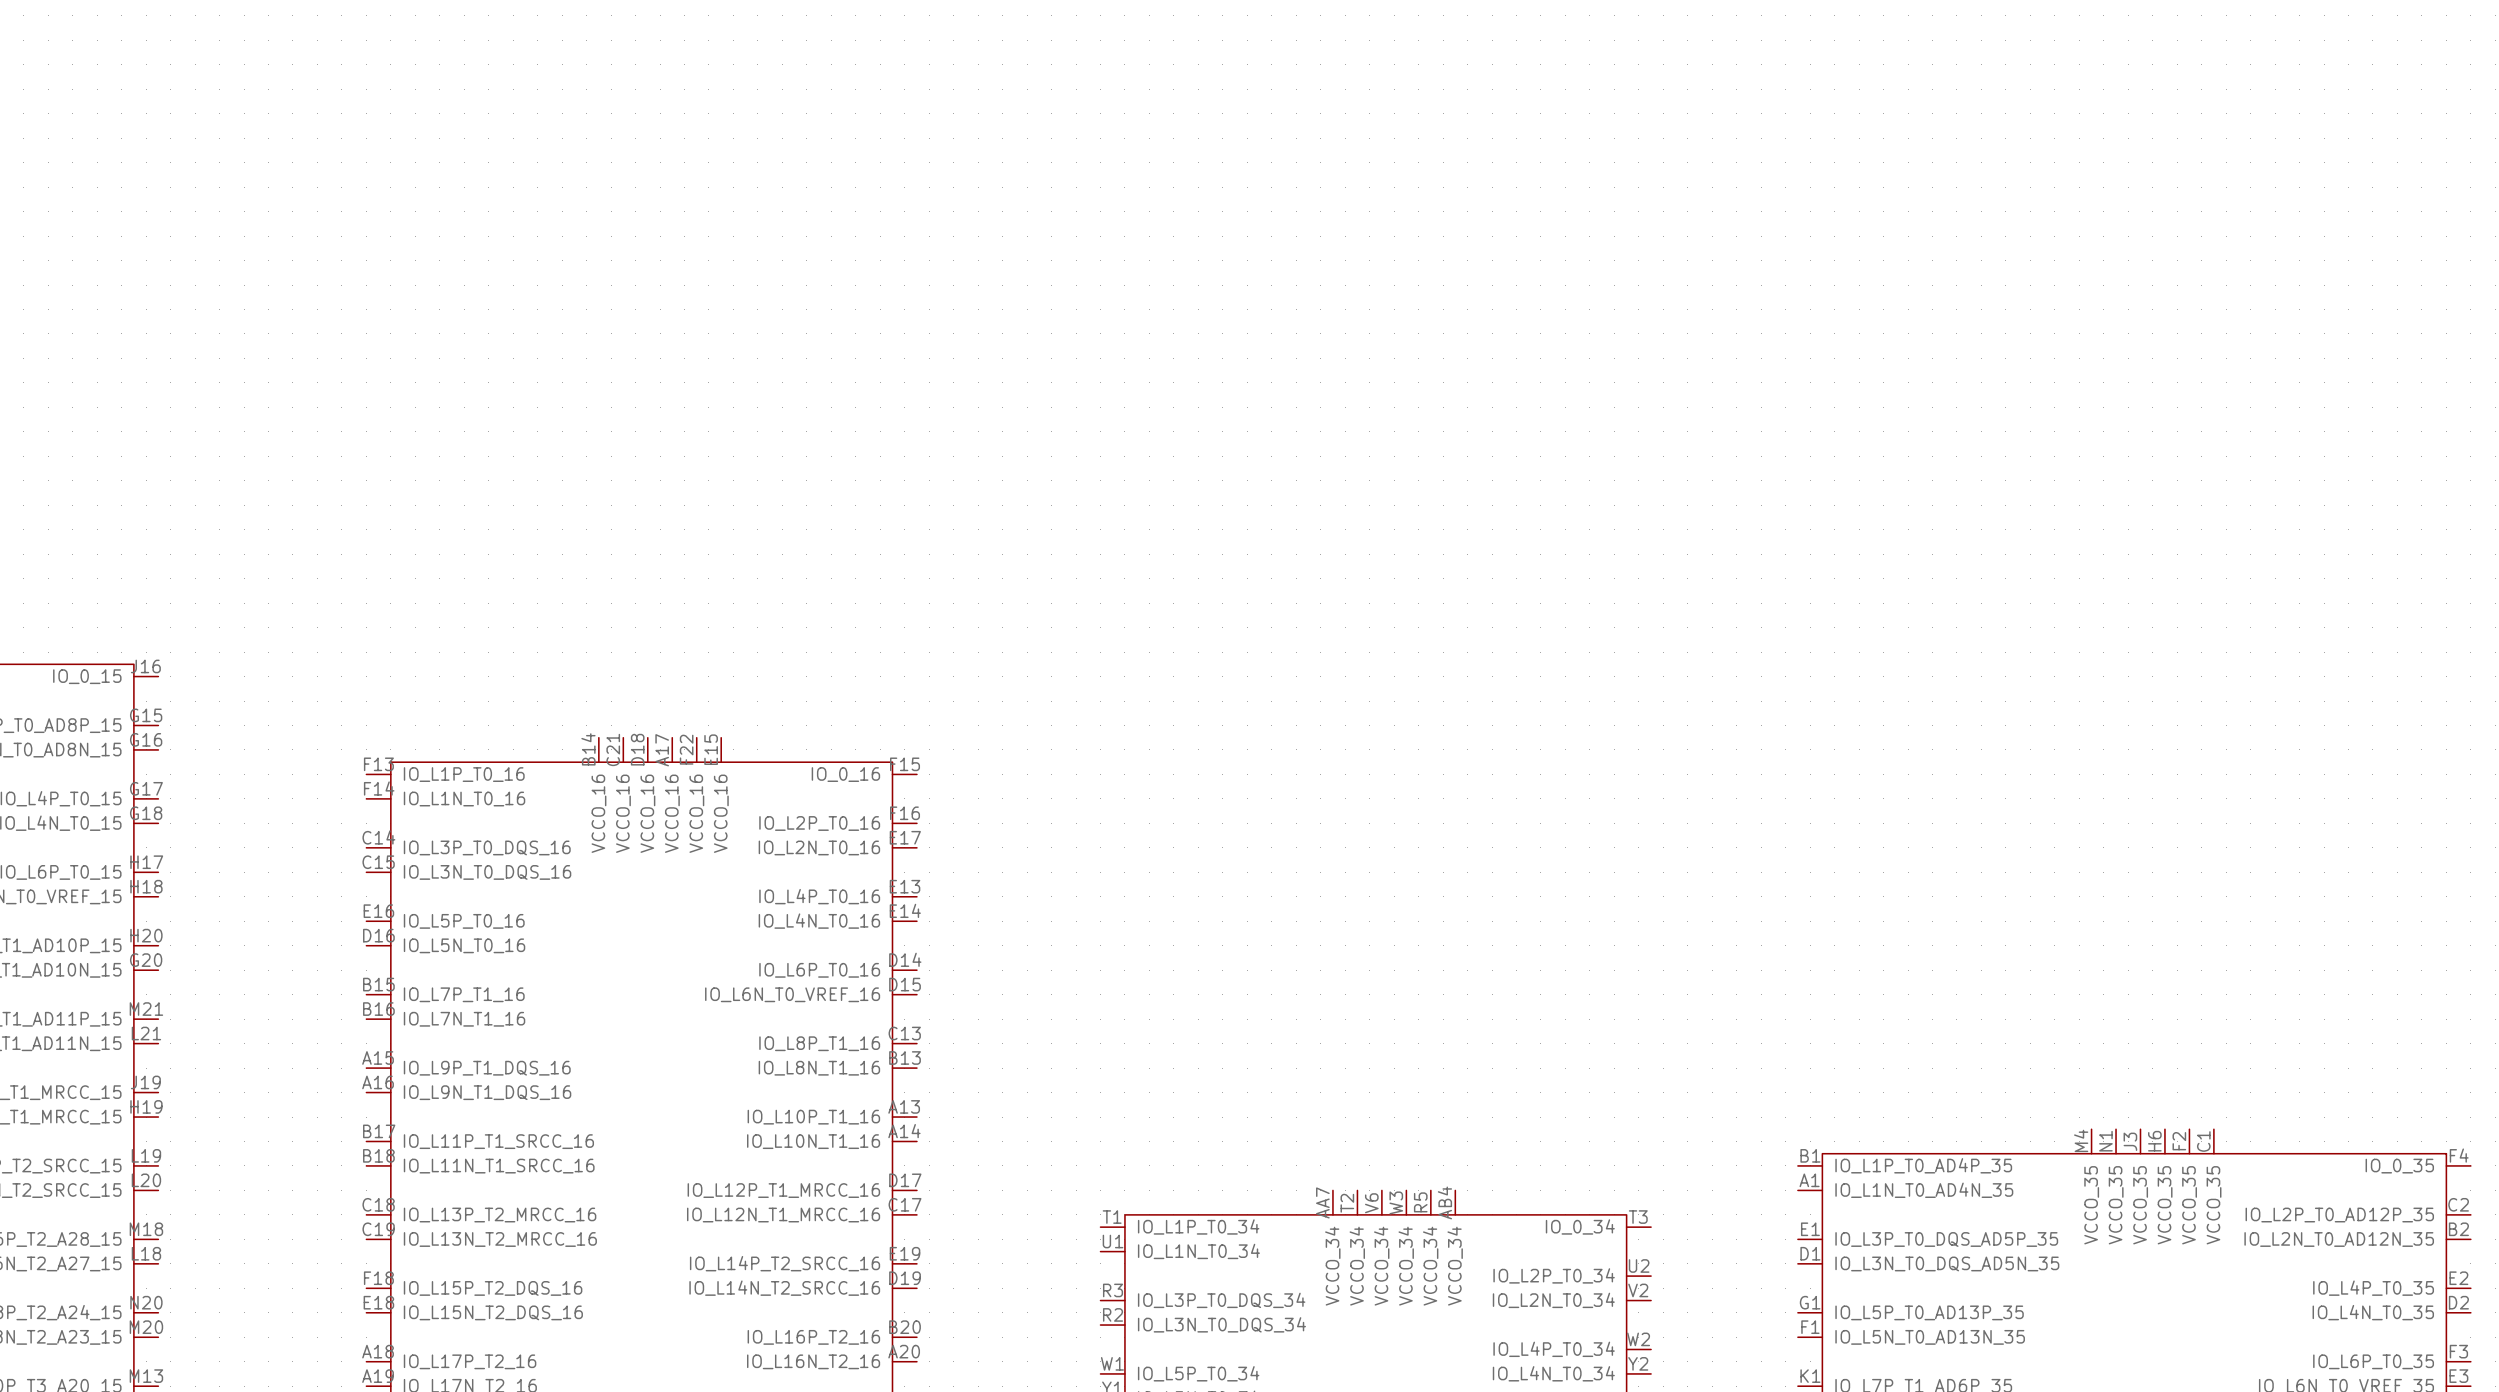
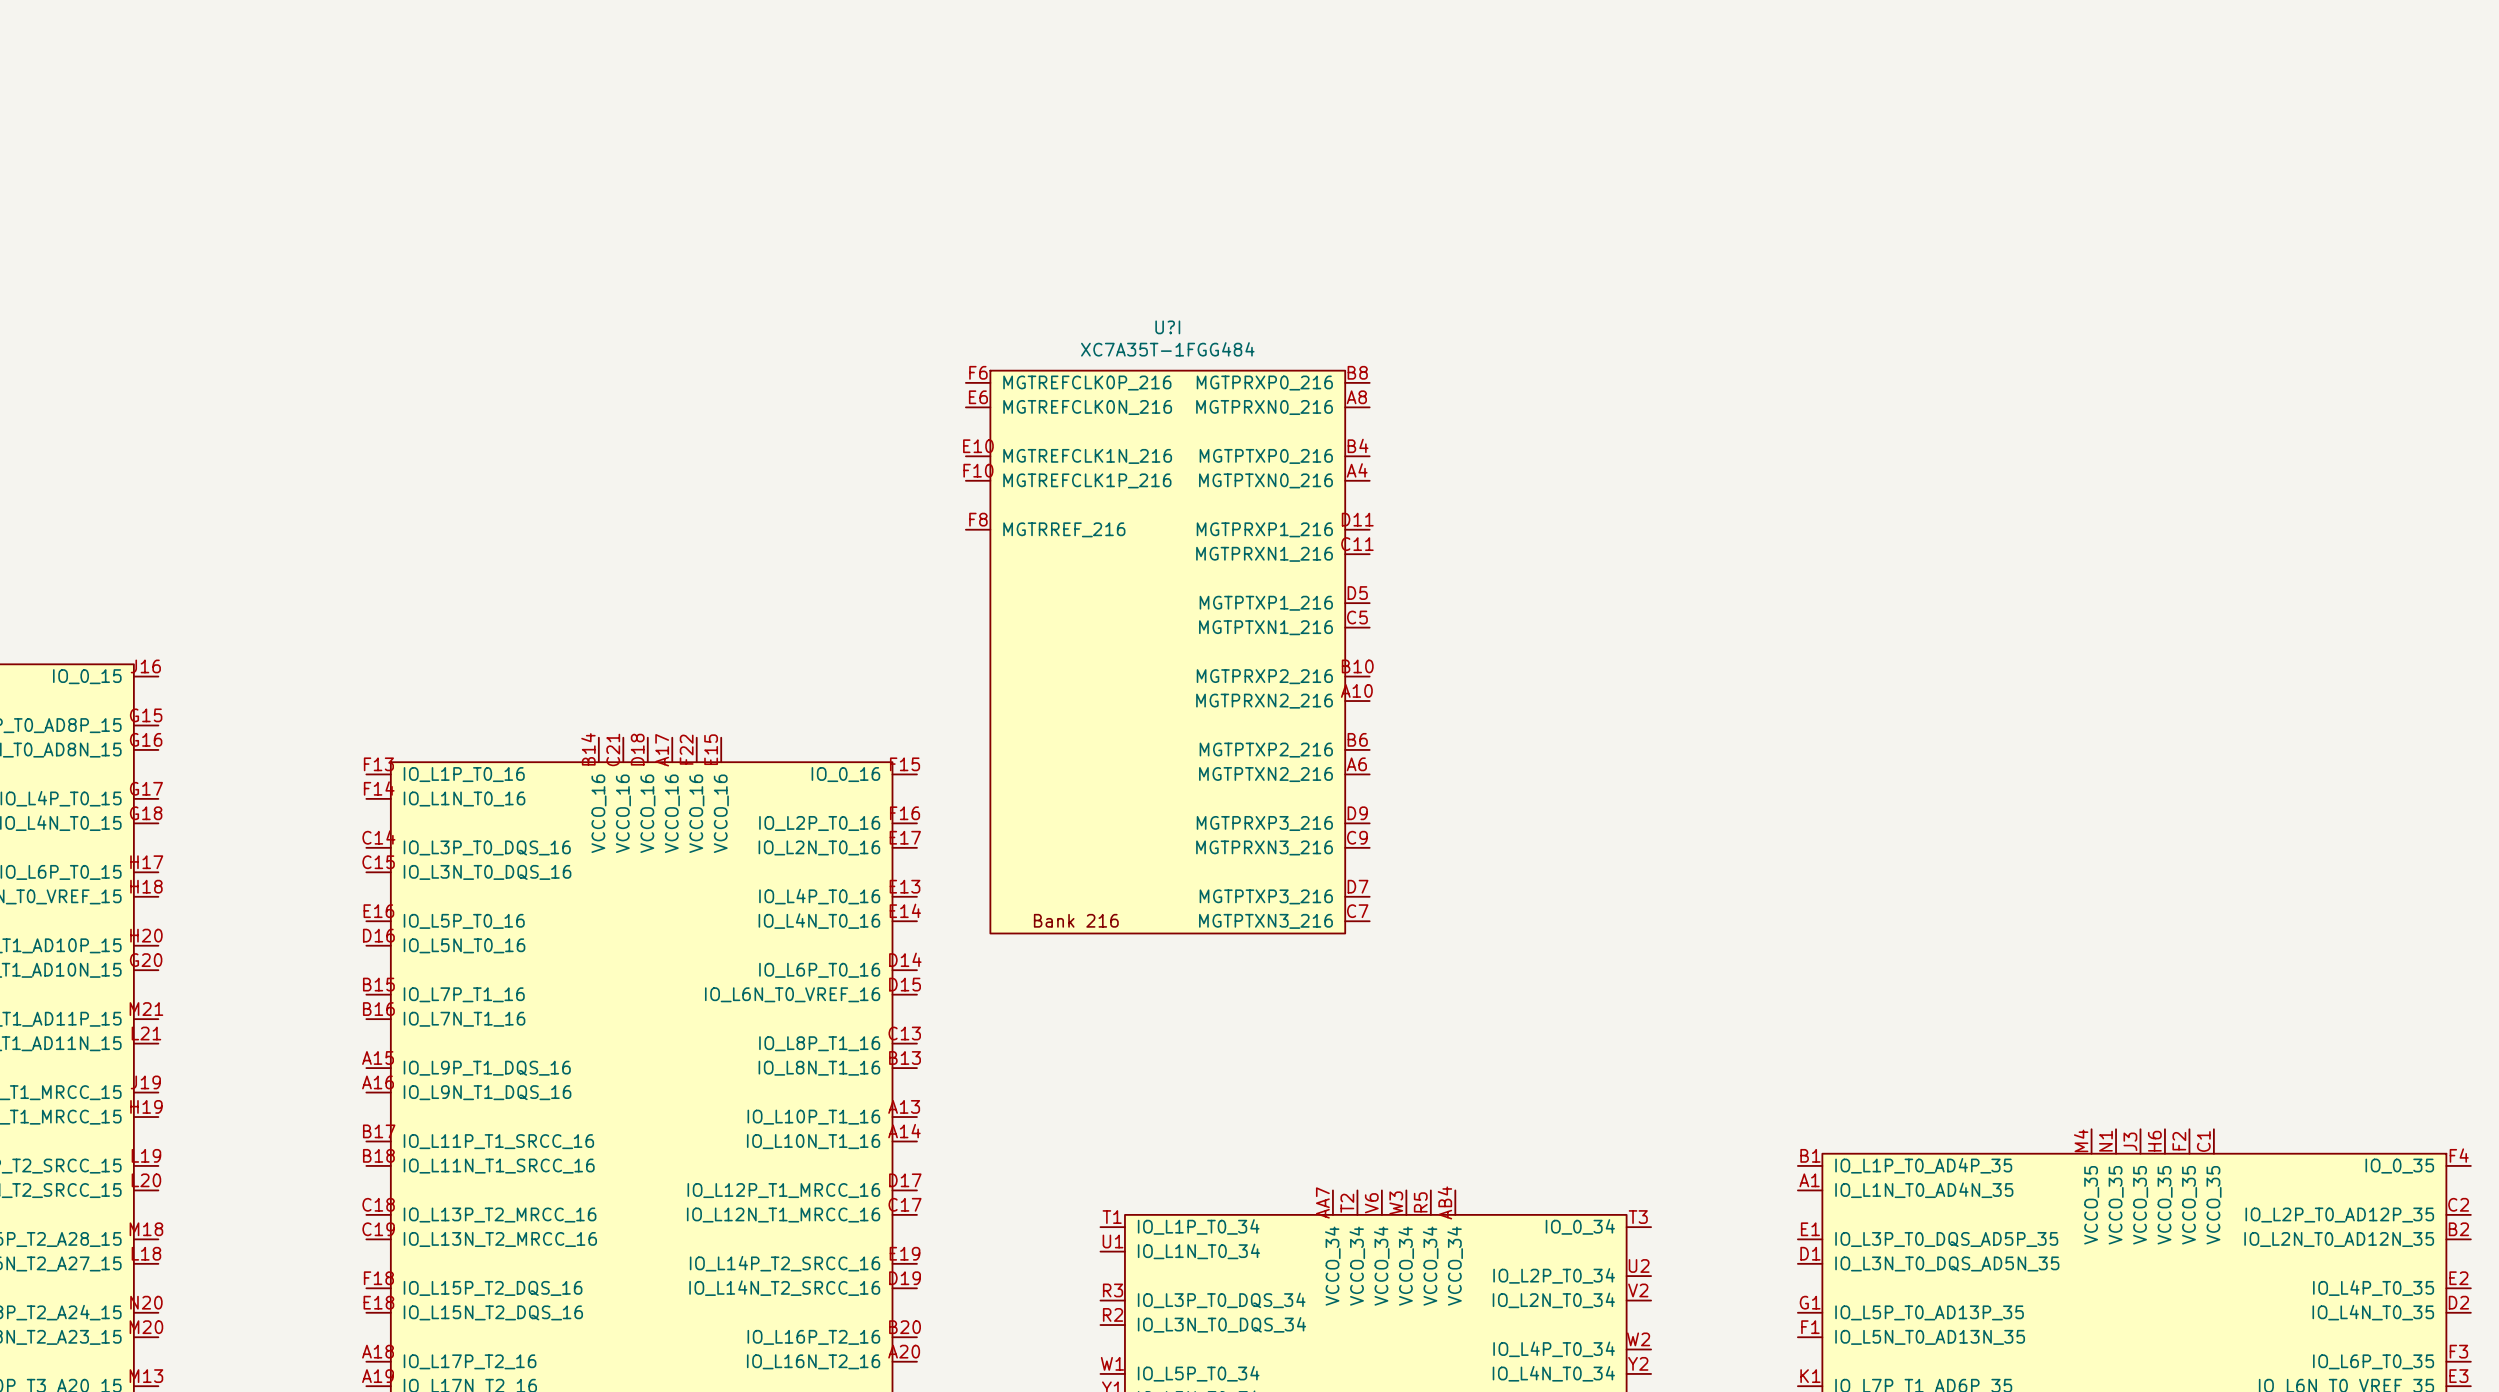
U?I: none -> XC7A35T-1FGG484 (1167, 652)

